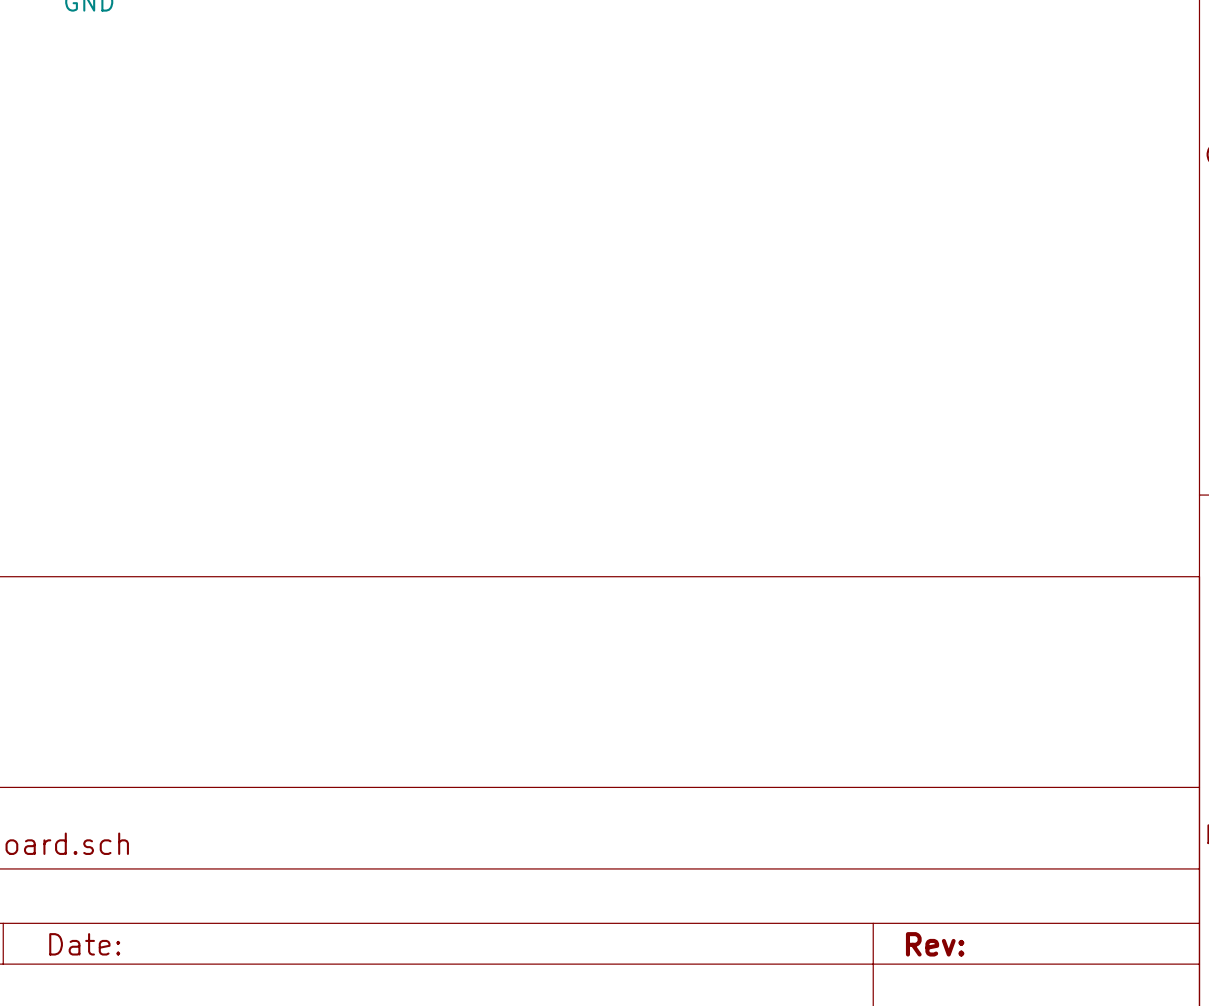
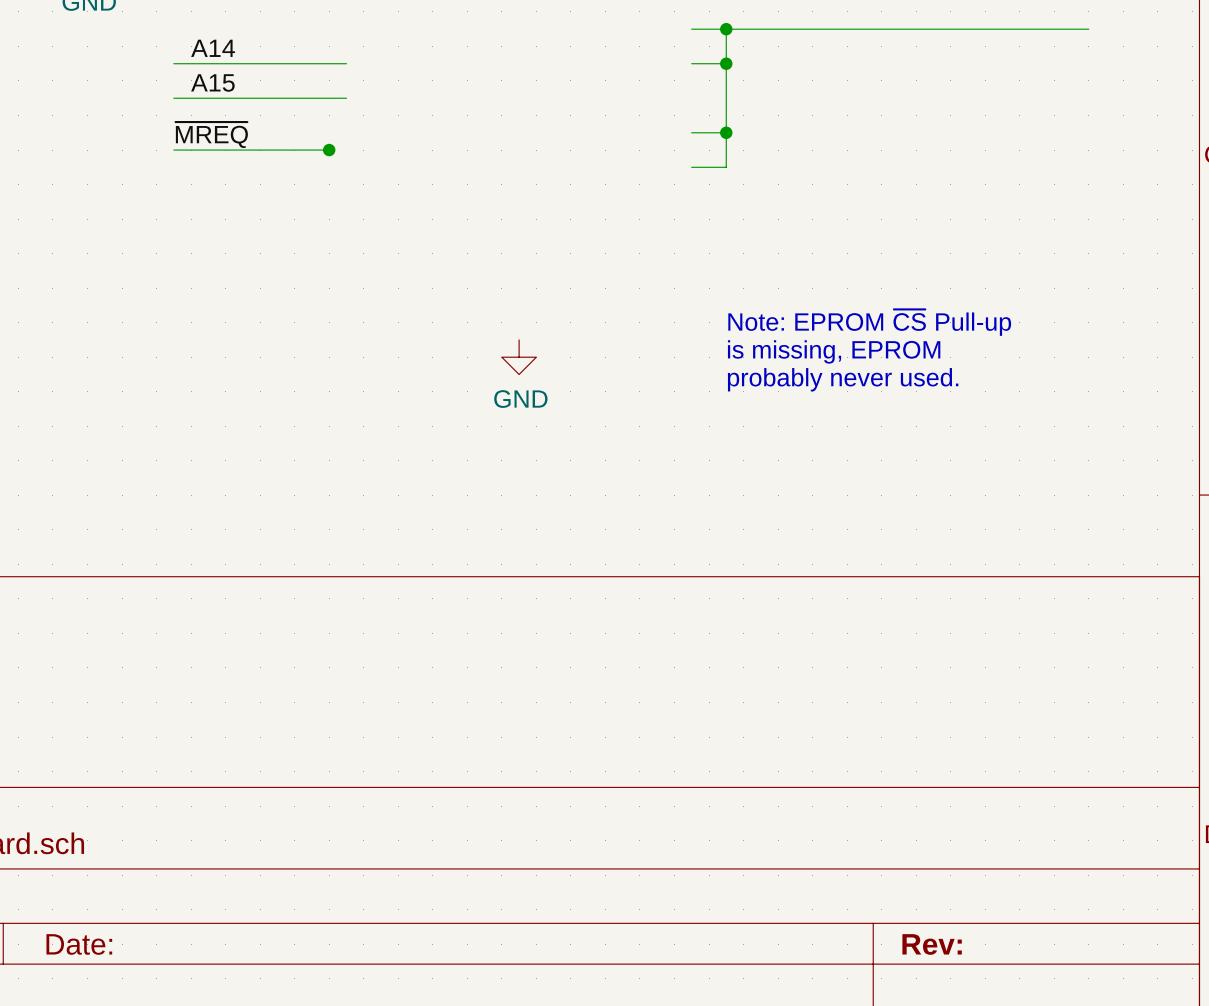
wire: none -> (691, 29) (1088, 29)
wire: none -> (726, 29) (726, 167) (691, 167)
junction: none -> (726, 29)
label: none -> A14 (213, 48)
wire: none -> (173, 63) (346, 63)
wire: none -> (691, 63) (726, 63)
junction: none -> (726, 63)
label: none -> A15 (212, 82)
wire: none -> (173, 98) (346, 98)
wire: none -> (691, 132) (726, 132)
junction: none -> (726, 132)
label: none -> ~{MREQ} (211, 135)
wire: none -> (173, 150) (329, 150)
junction: none -> (329, 150)
text: none -> Note: EPROM ~{CS} Pull-up (869, 322)
text: none -> is missing, EPROM (834, 351)
power symbol: none -> GND (519, 357)
text: none -> probably never used. (843, 379)

